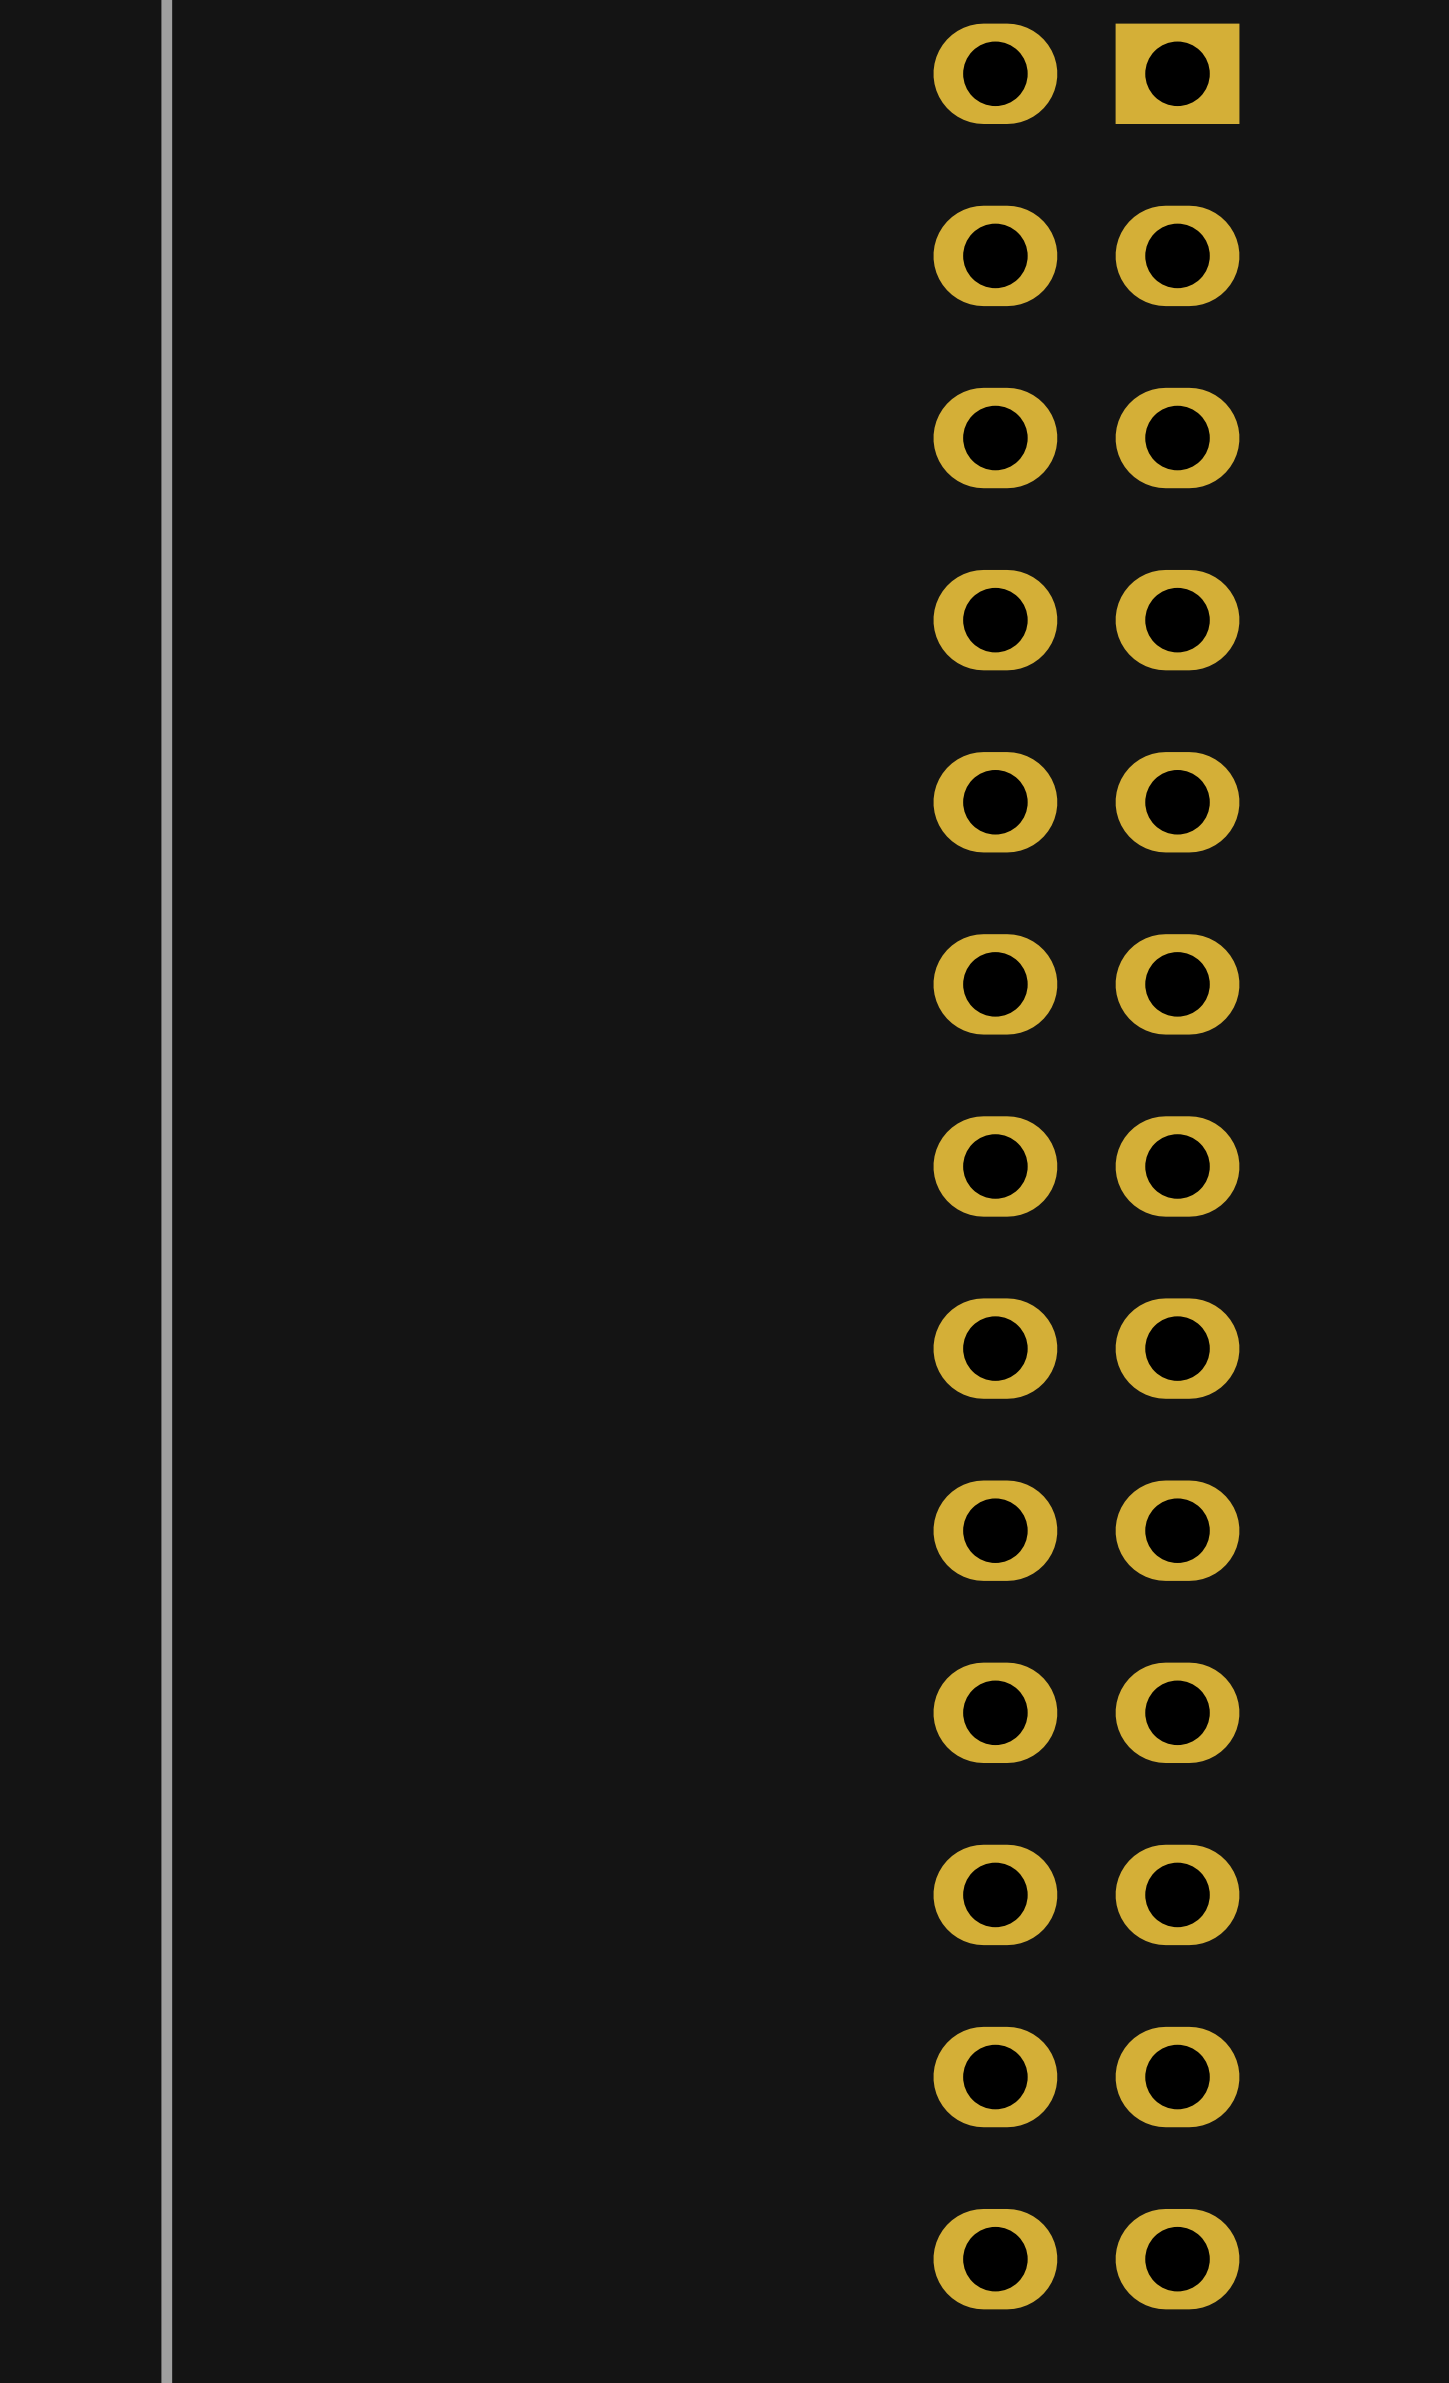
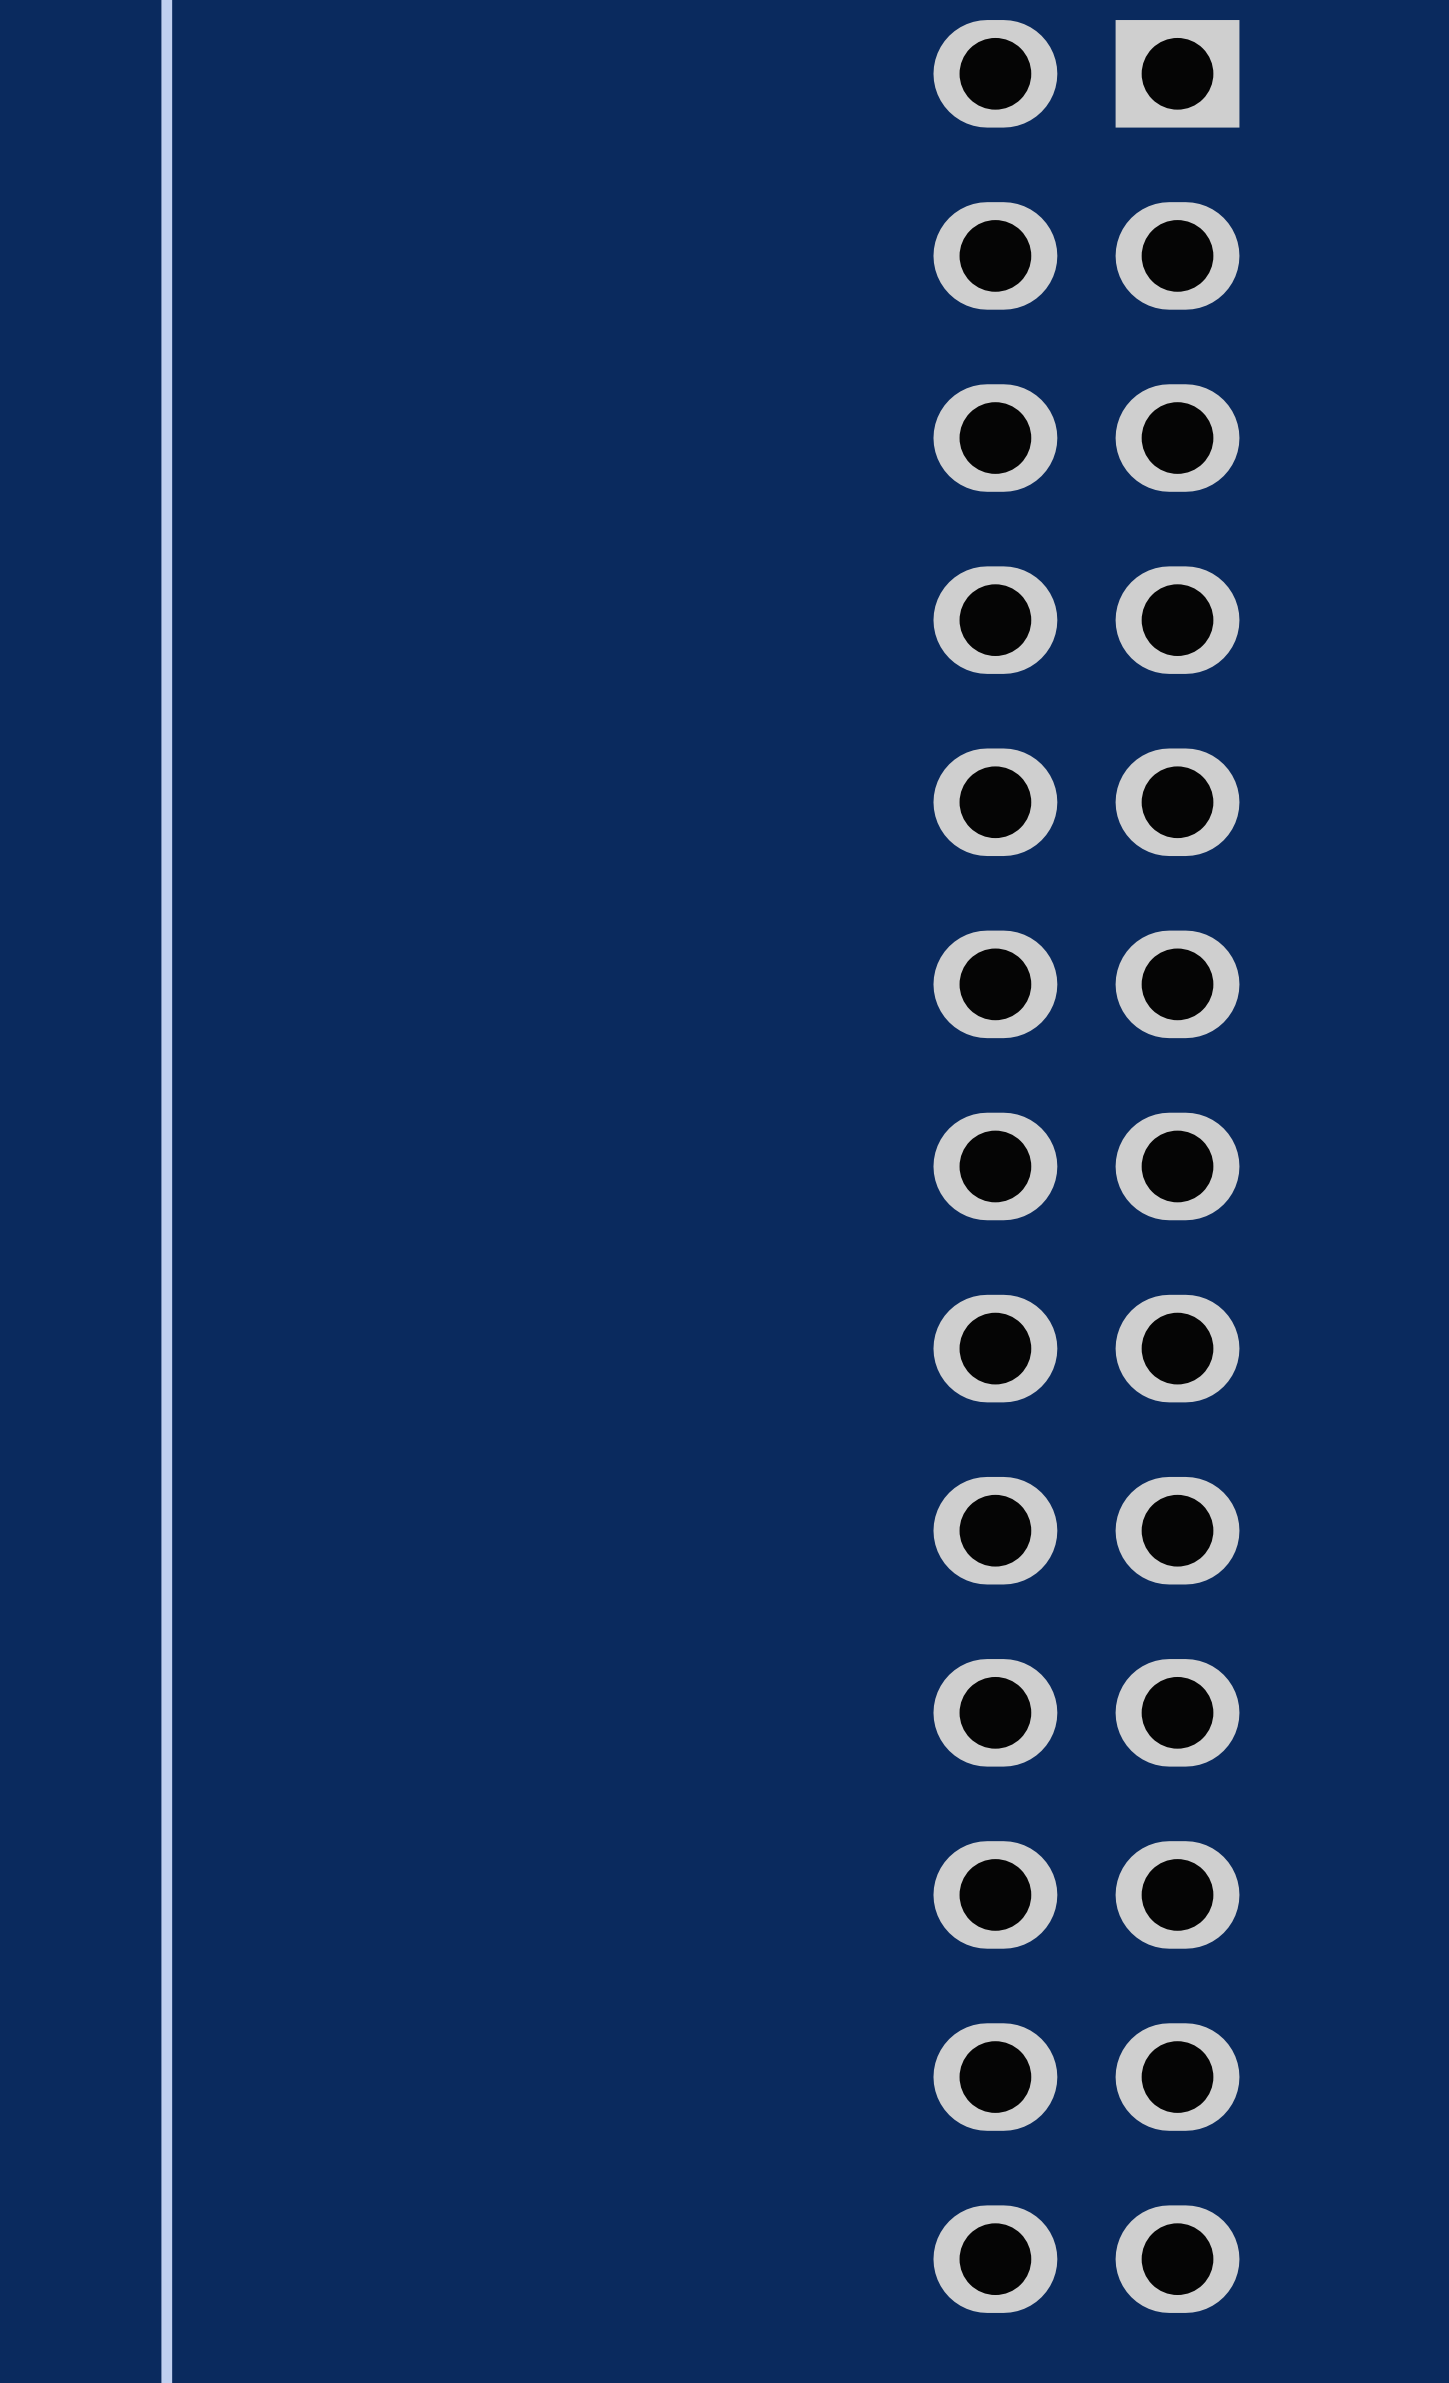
part footprint: [933, 23, 1240, 2310] -> [933, 20, 1240, 2313]

